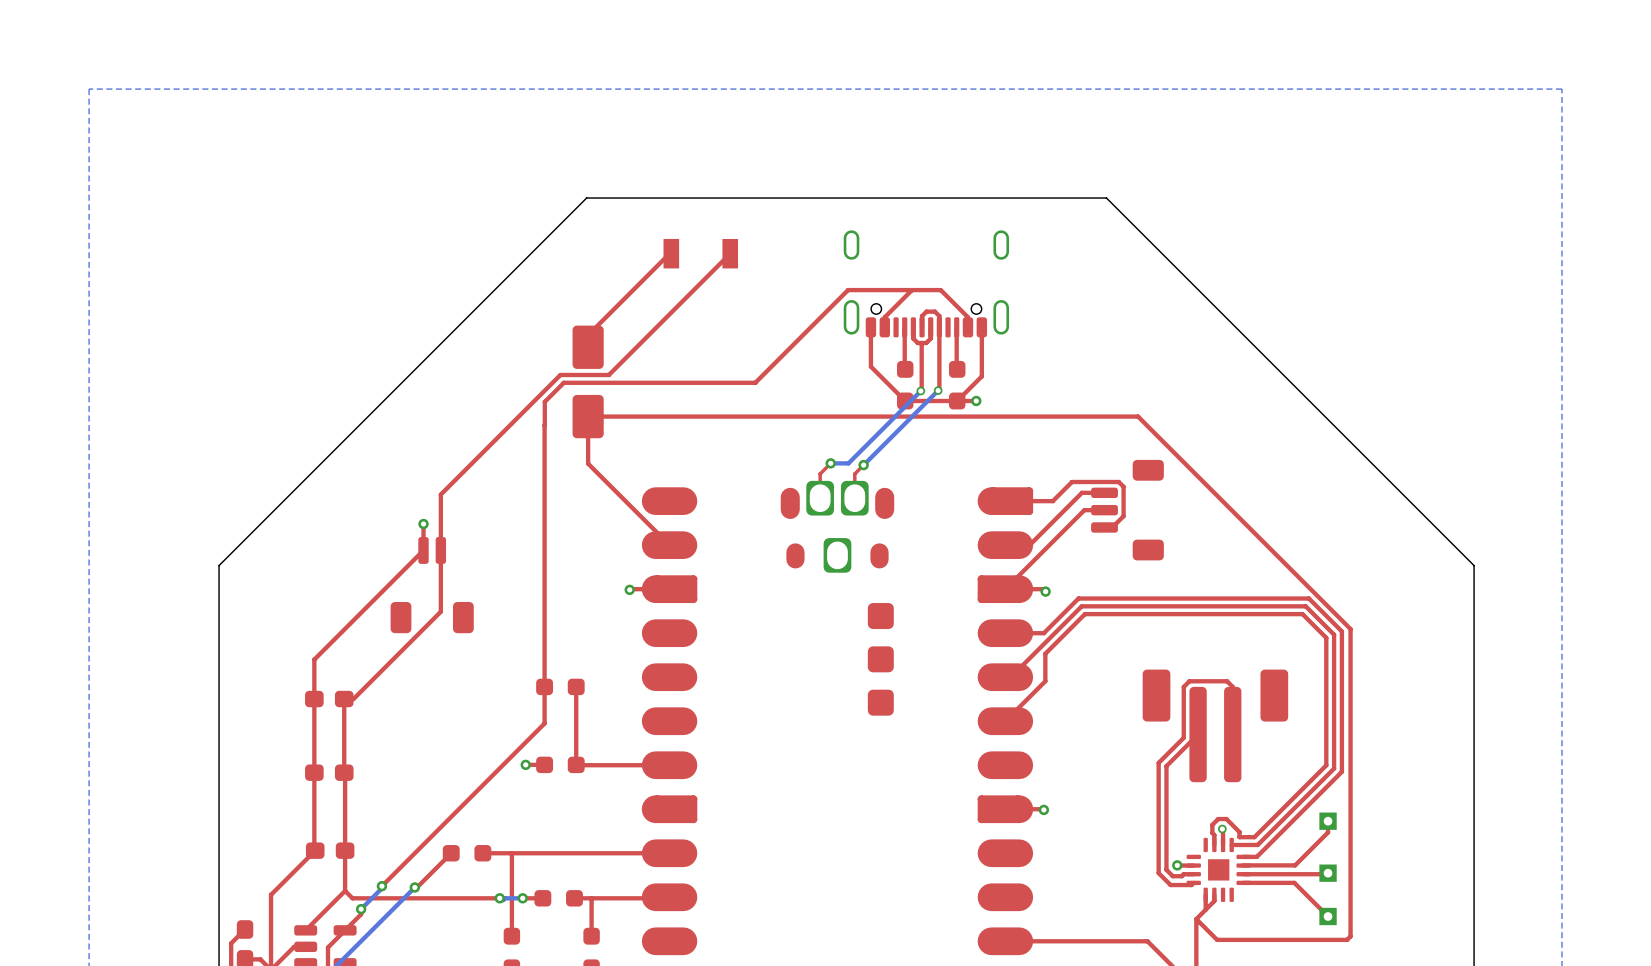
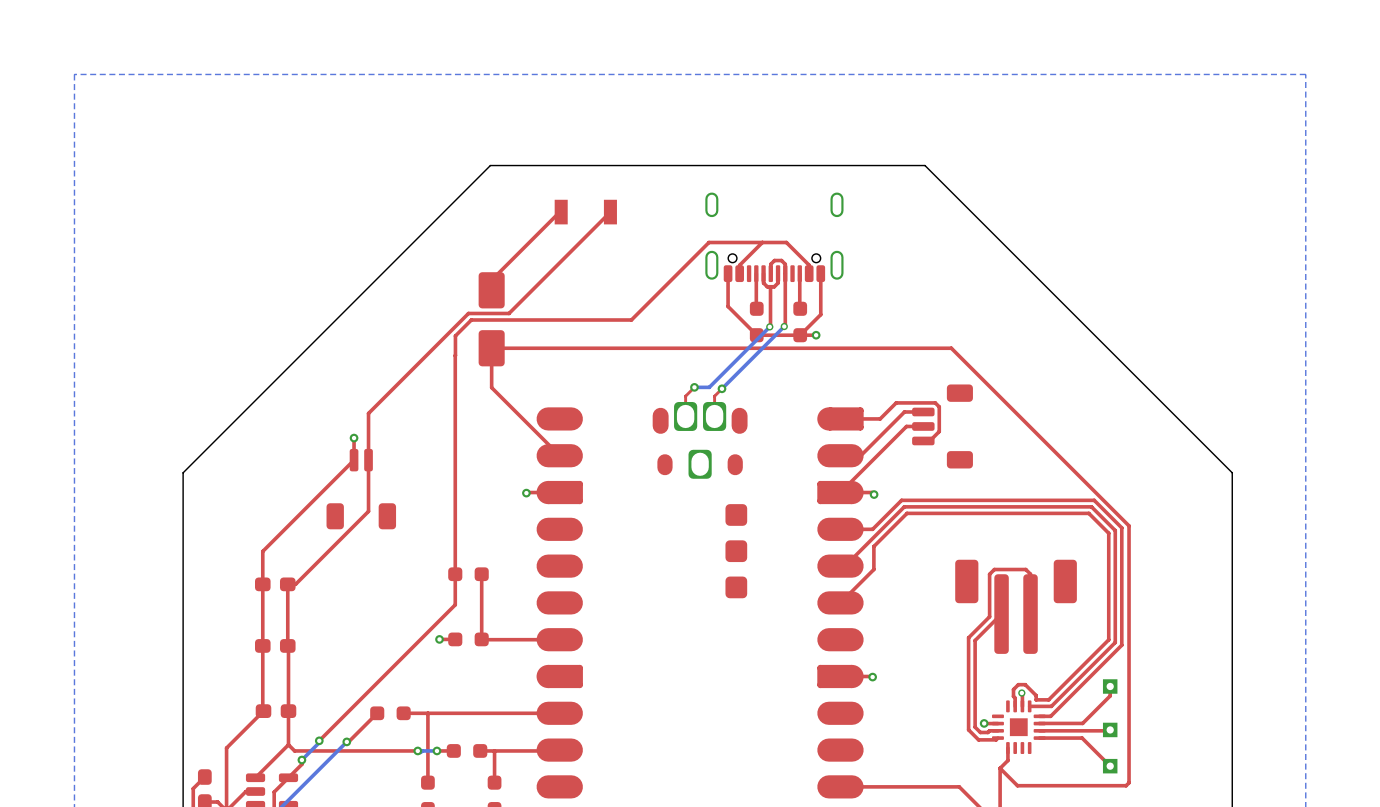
top track: (1214, 894) (1214, 901) (1205, 909) -> none

